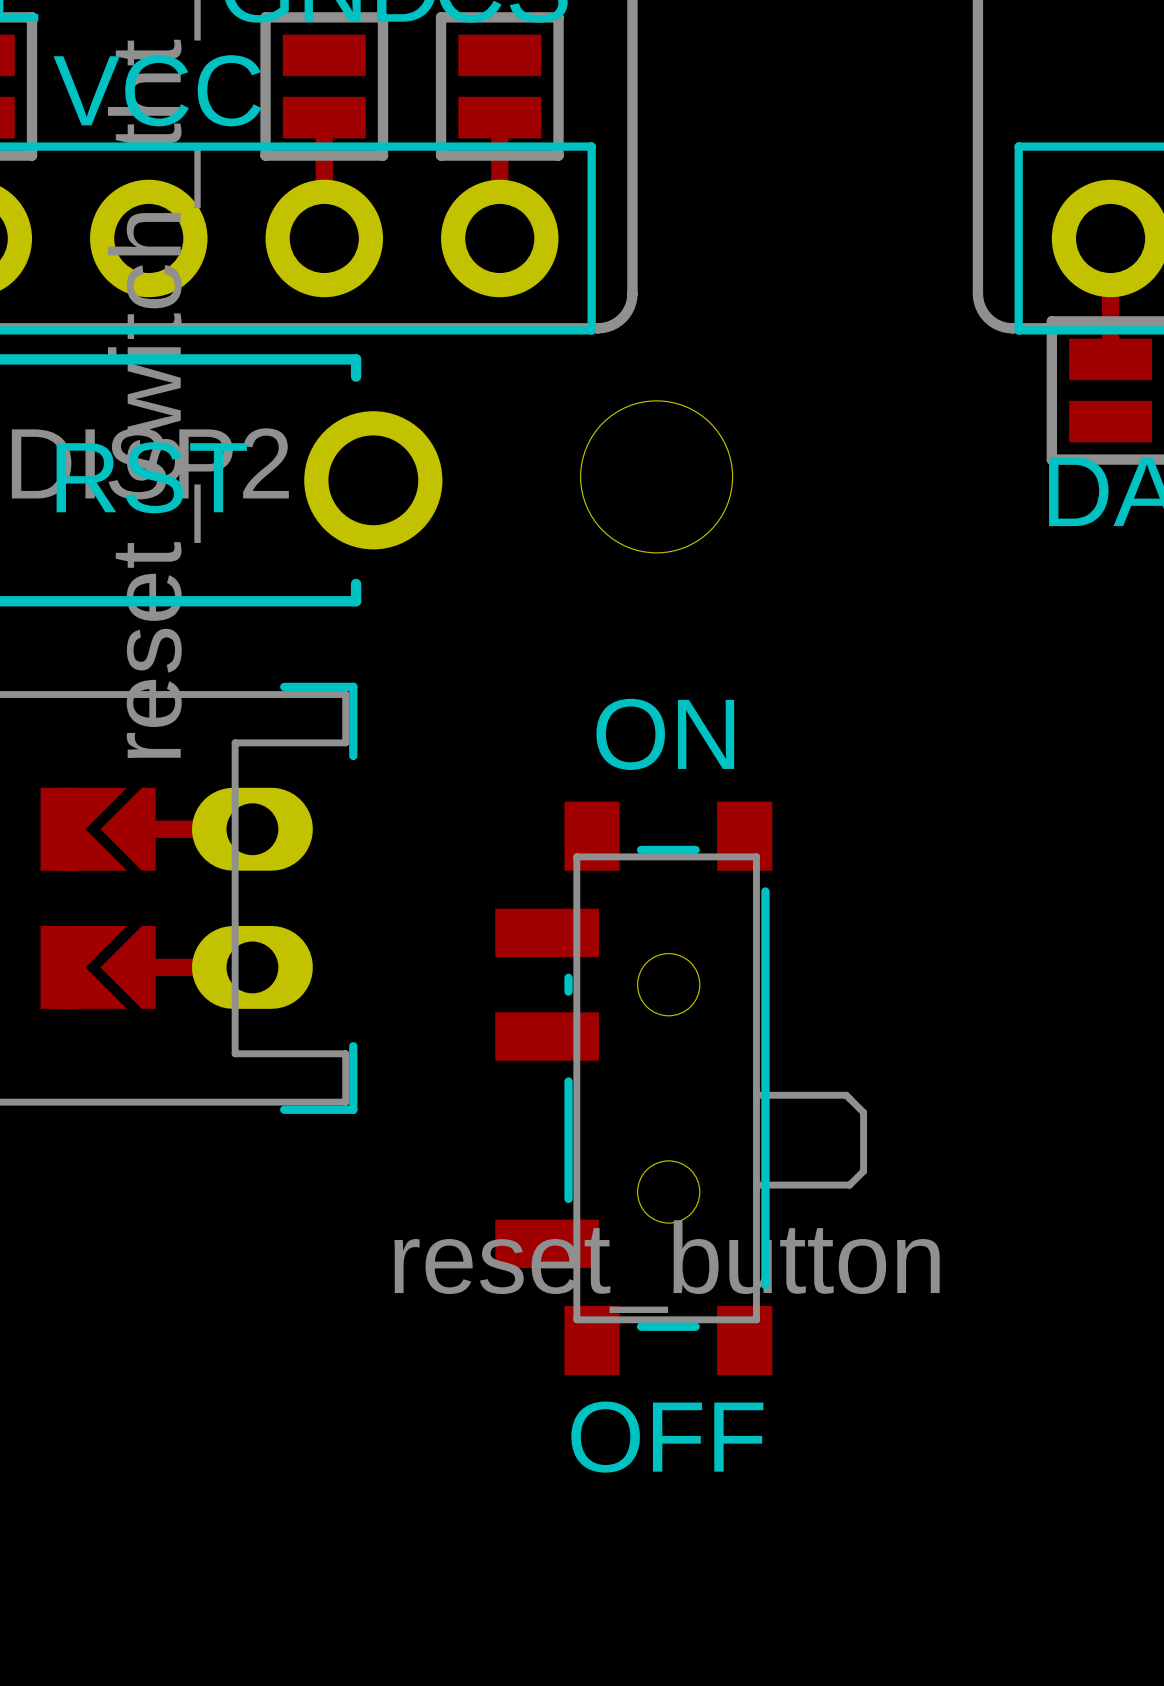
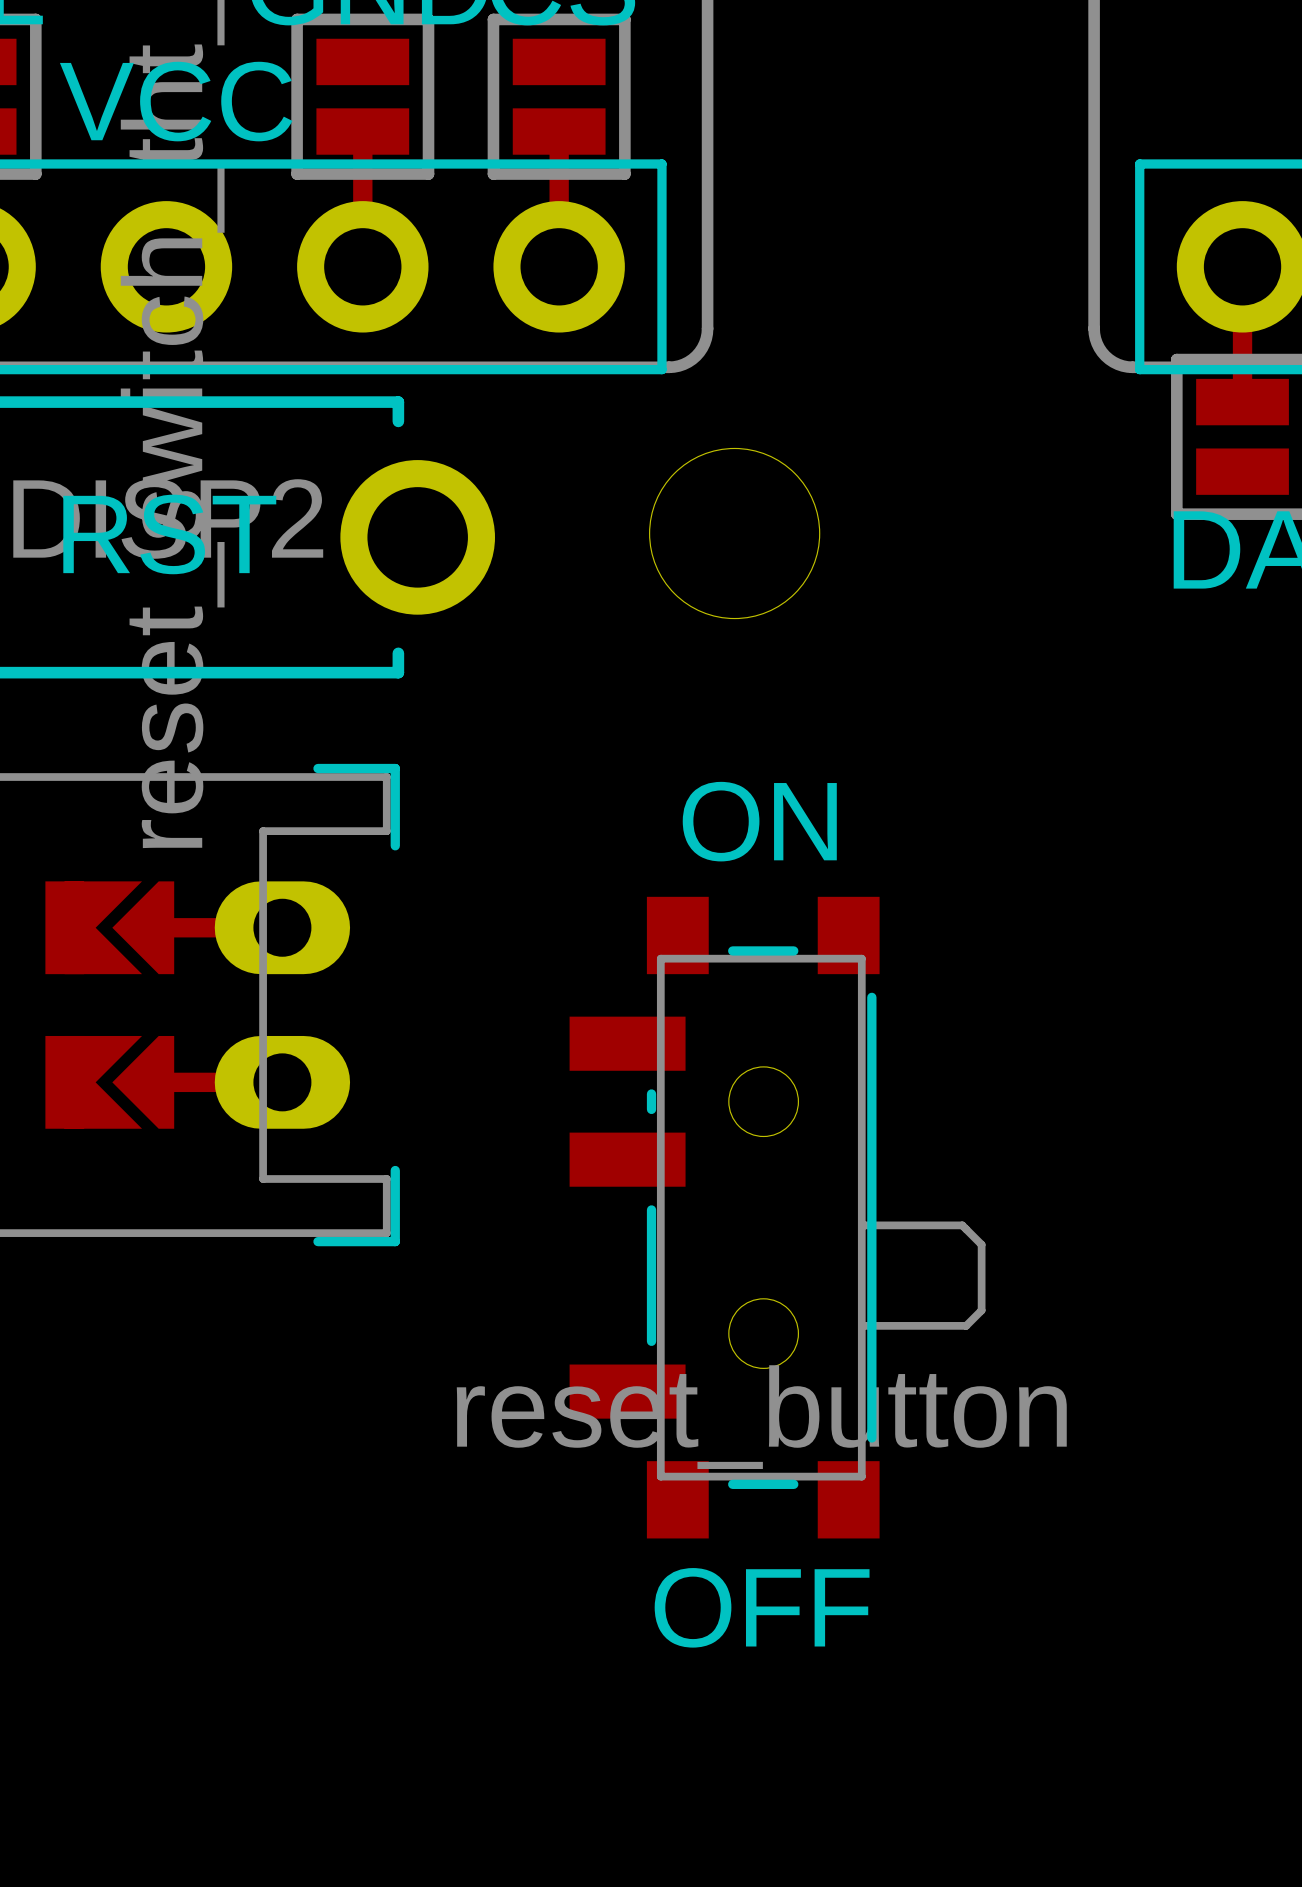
part position: (681, 1088) -> (777, 1217)

